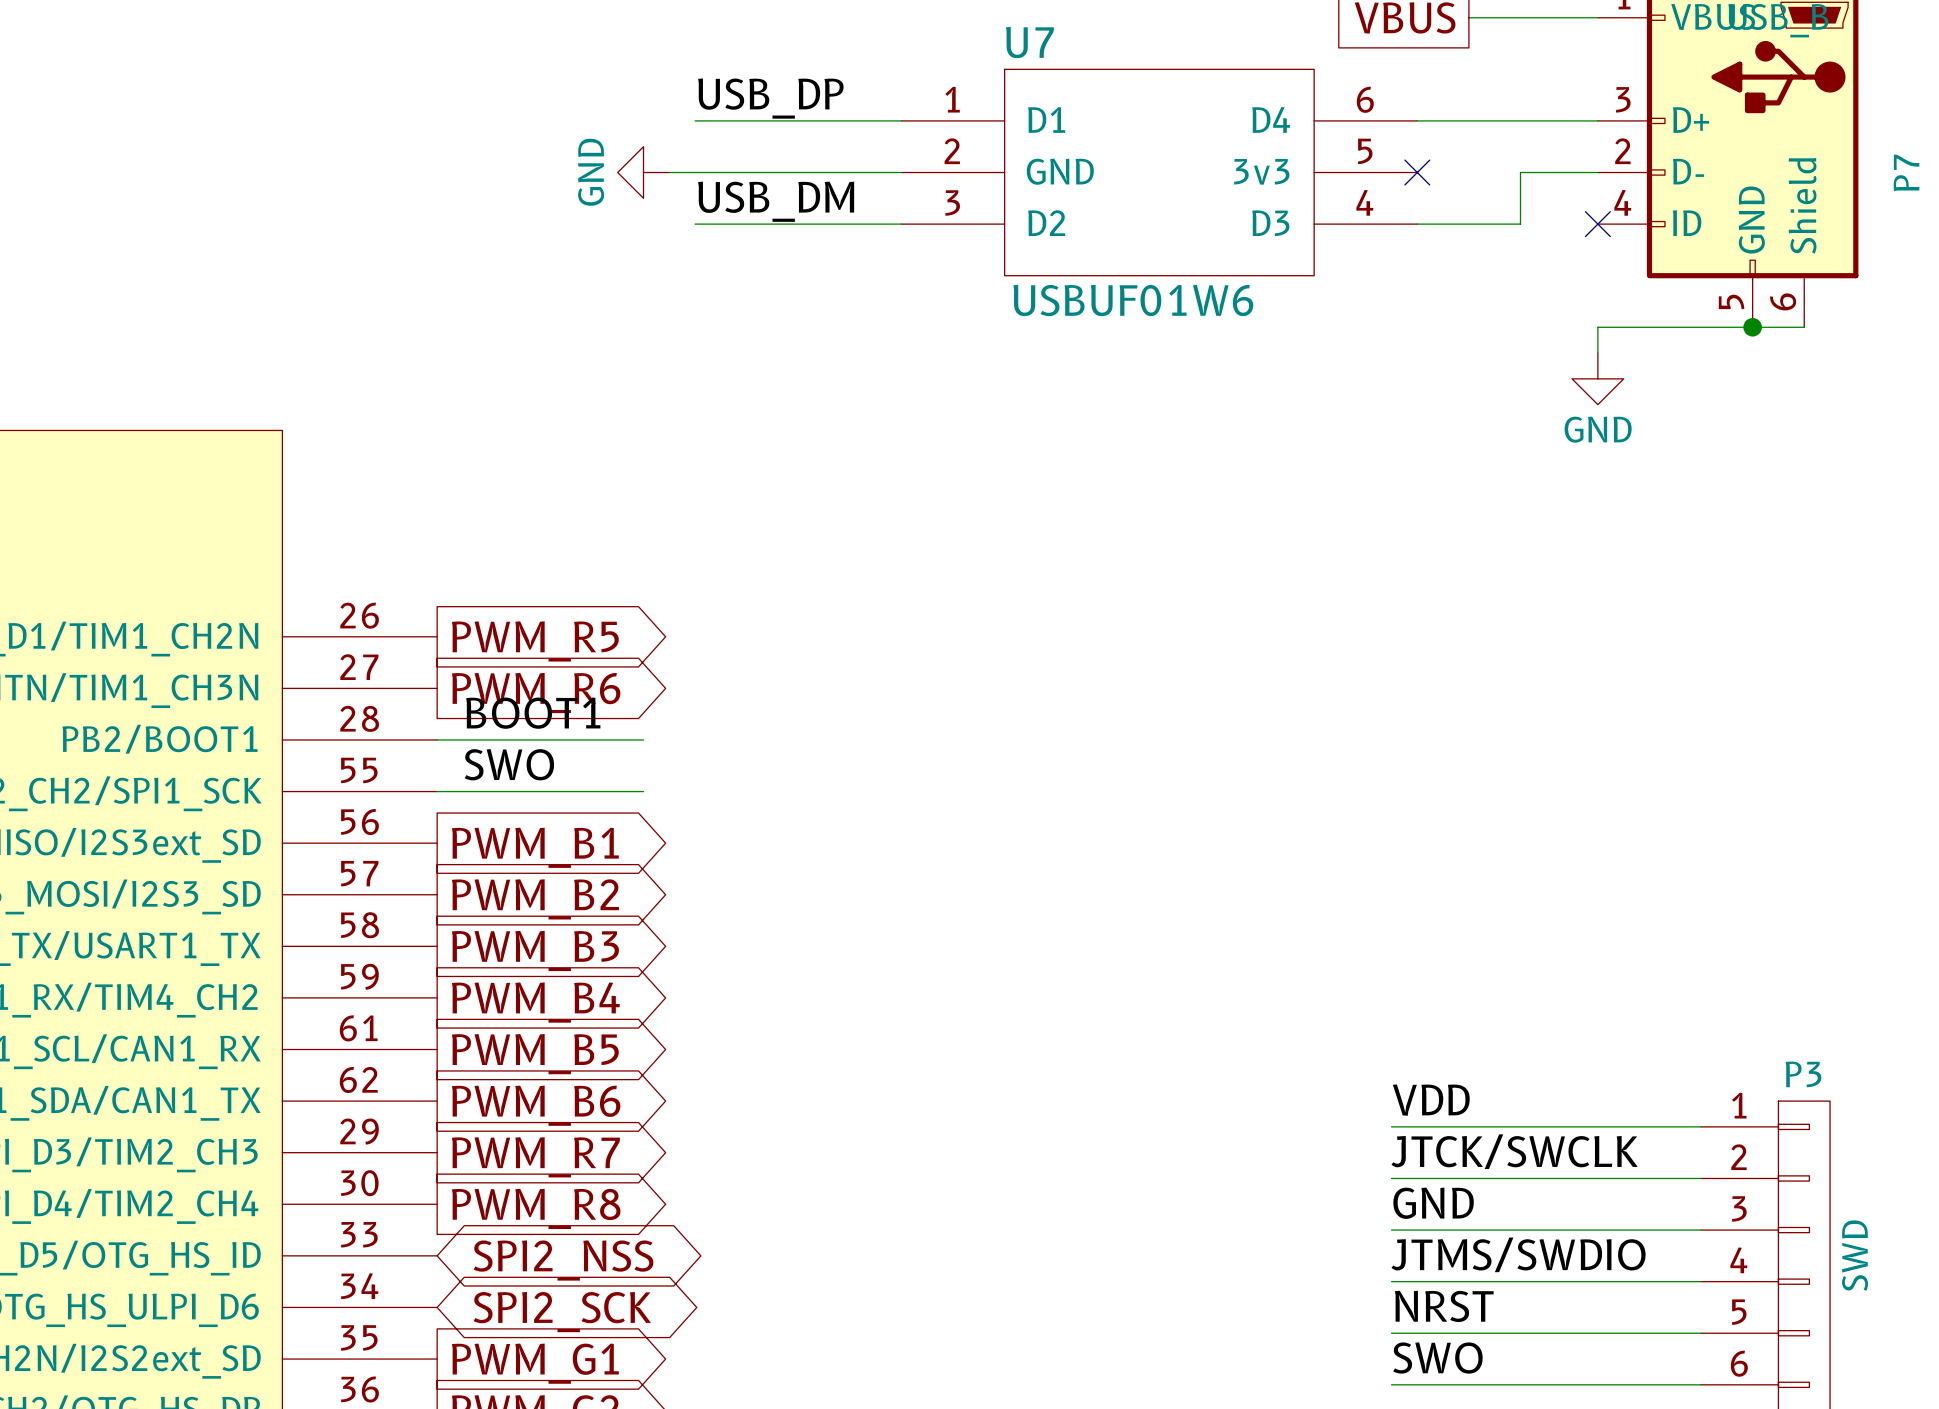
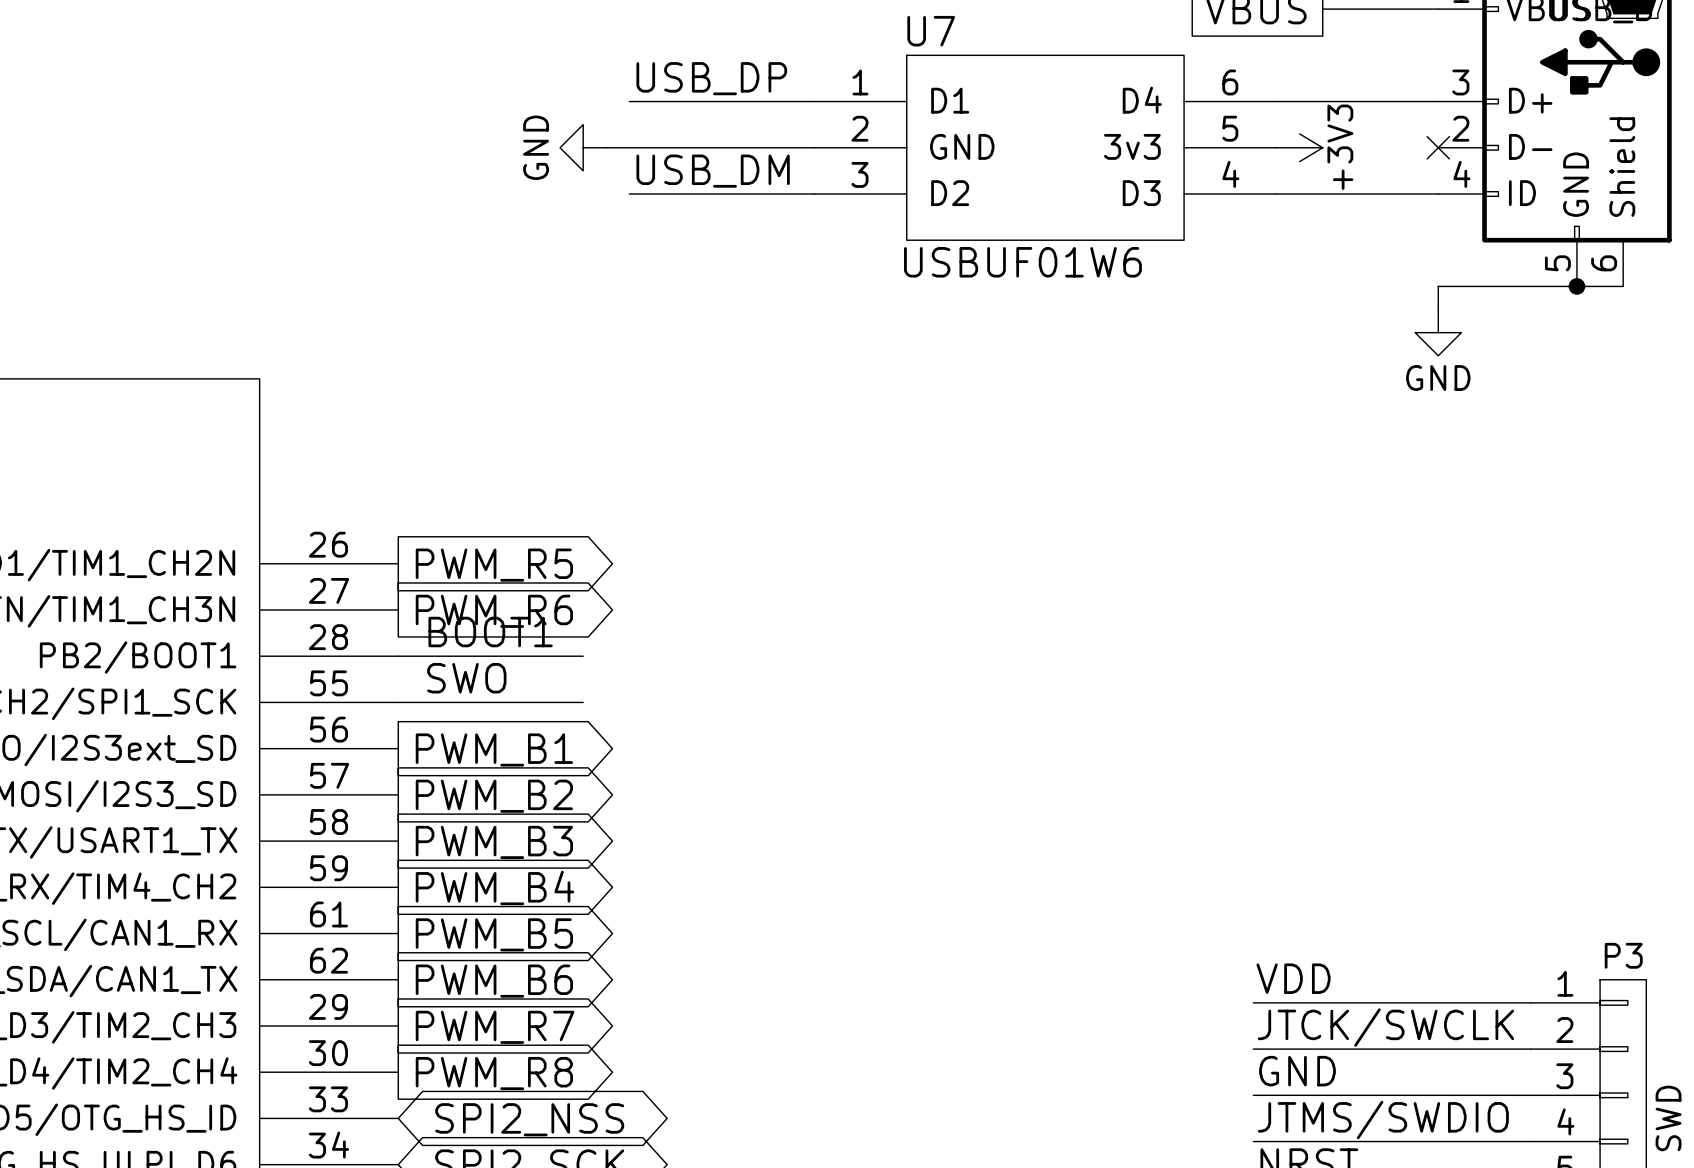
no-connect mark: (1417, 172) -> none
power symbol: none -> +3V3 (1299, 147)
wire: (1597, 172) (1520, 172) (1520, 224) -> (1438, 193) (1368, 193)
no-connect mark position: (1597, 224) -> (1438, 147)

